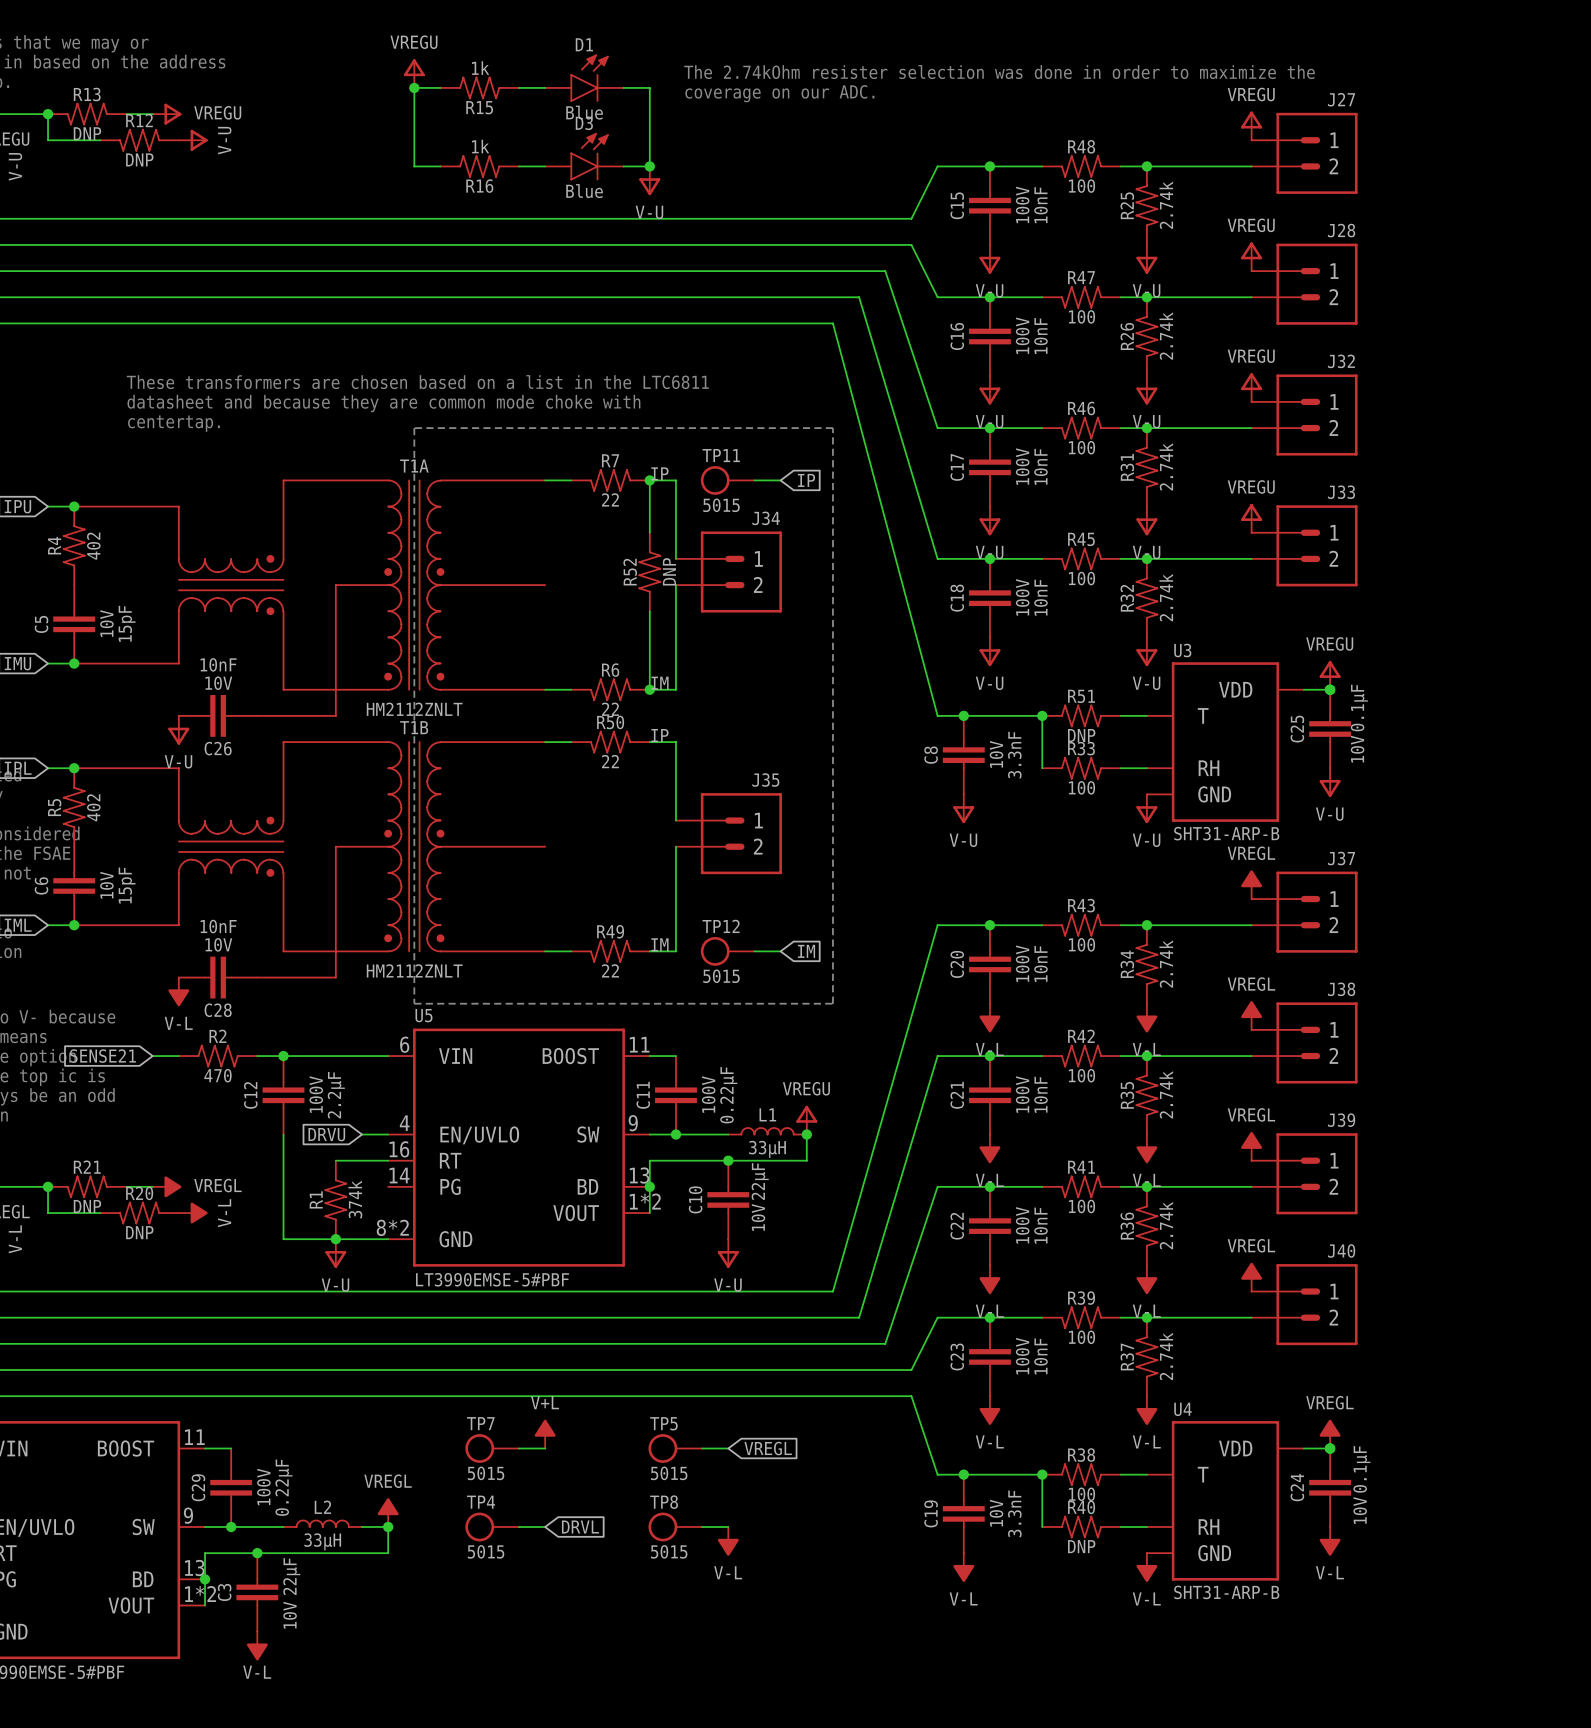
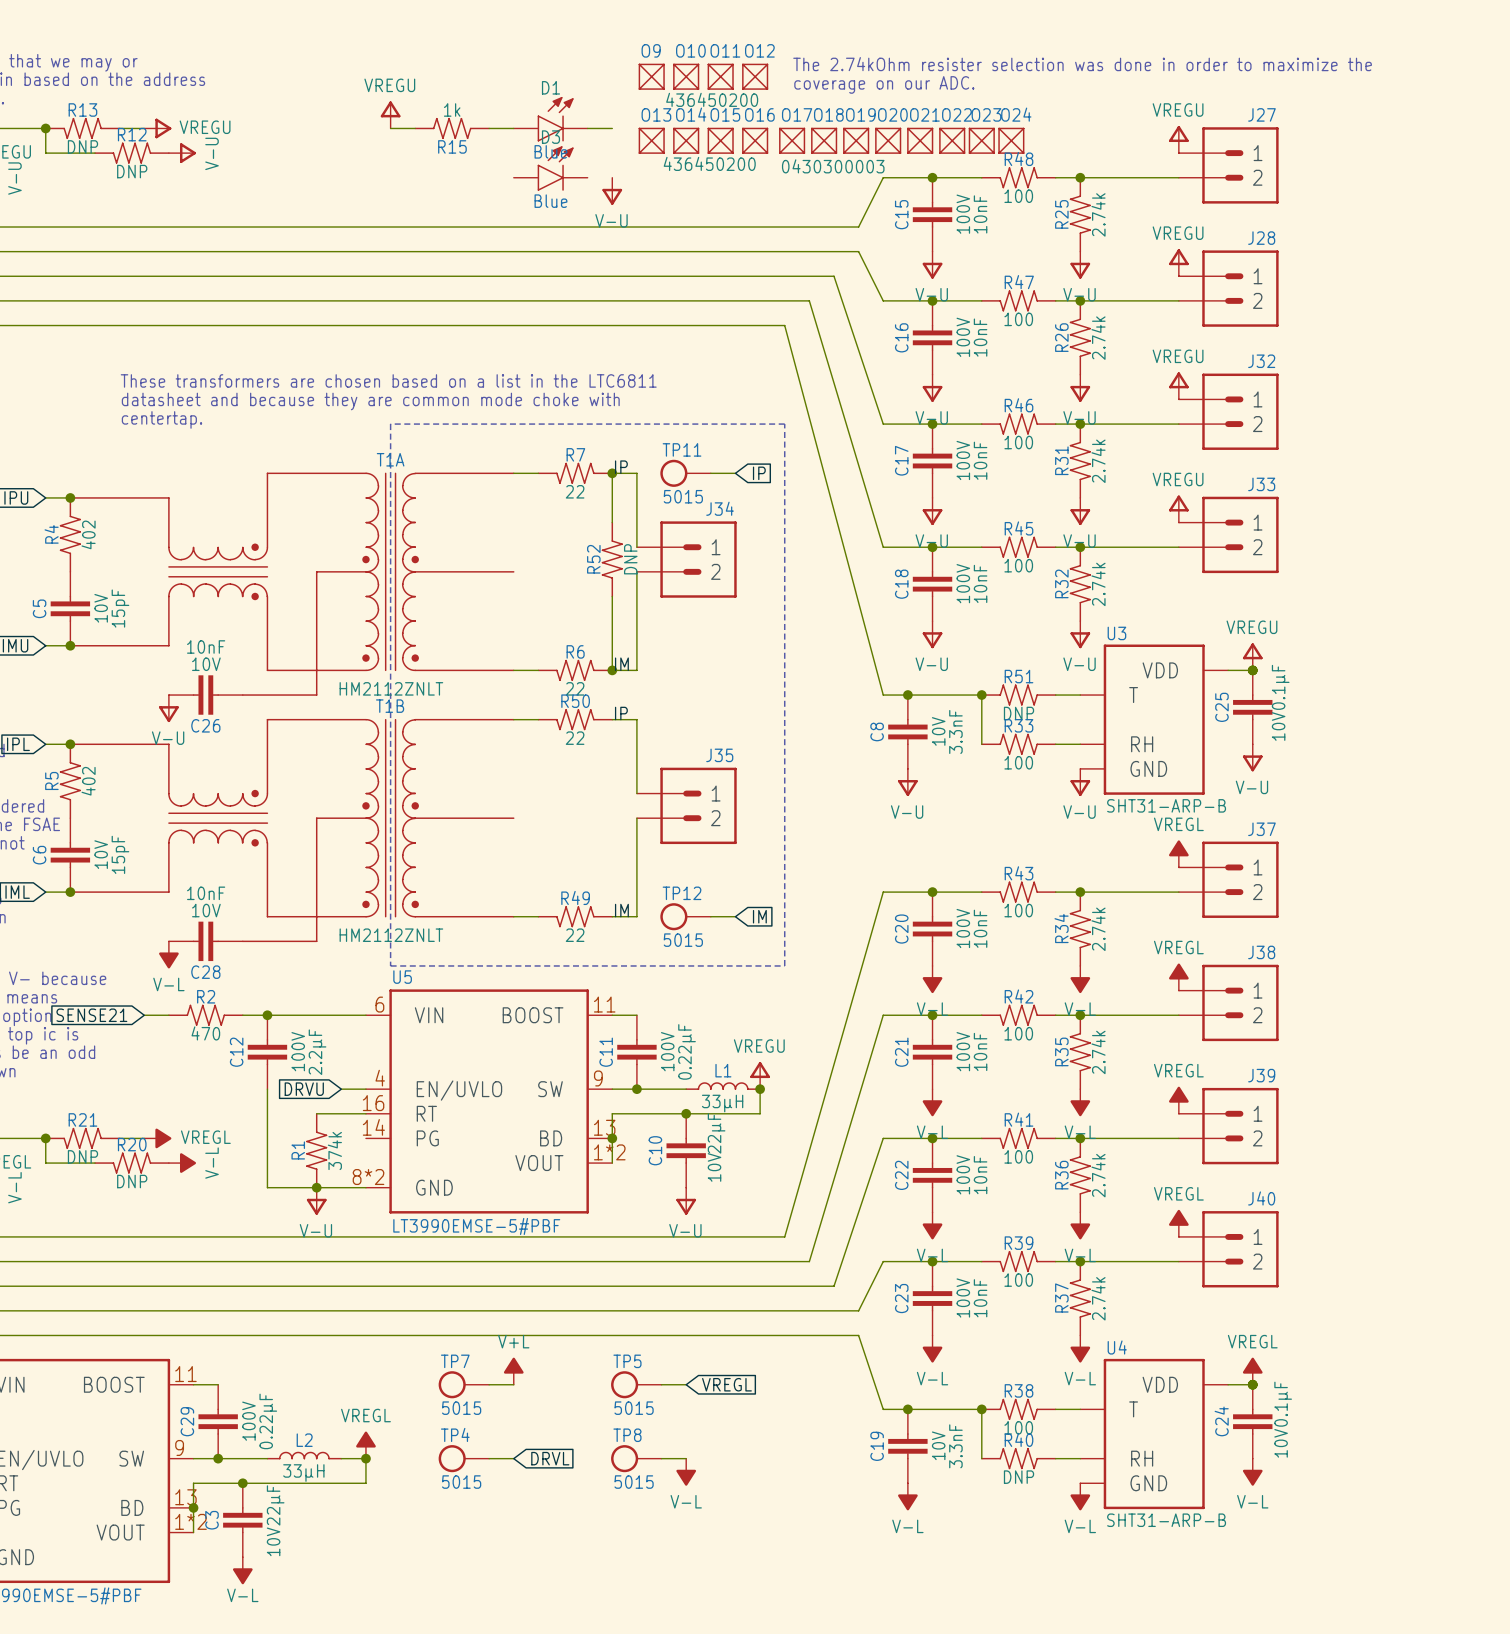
O9: none -> (651, 76)
O10: none -> (686, 76)
O11: none -> (720, 76)
O12: none -> (755, 76)
text position: The 2.74kOhm resister selection was done in order to maximize the (999, 72) -> The 2.74kOhm resister selection was done in order to maximize the (1082, 64)
power symbol position: VREGU (414, 73) -> VREGU (390, 114)
D1 position: (584, 78) -> (550, 119)
junction: (414, 87) -> none
wire: (440, 87) (414, 87) (414, 166) (440, 166) -> none
R15 position: (479, 87) -> (452, 128)
wire: (518, 87) (545, 87) -> (489, 128) (513, 128)
wire: (623, 87) (649, 87) (649, 166) (623, 166) -> none
text position: coverage on our ADC. (779, 93) -> coverage on our ADC. (884, 84)
wire: none -> (390, 128) (415, 128)
O13: none -> (651, 140)
O14: none -> (686, 140)
O15: none -> (720, 140)
O16: none -> (755, 140)
O17: none -> (792, 140)
O18: none -> (824, 140)
O19: none -> (856, 140)
O20: none -> (888, 140)
O21: none -> (920, 140)
O22: none -> (952, 140)
O23: none -> (981, 140)
O24: none -> (1011, 140)
R16: (479, 166) -> none
wire: (518, 166) (545, 166) -> (587, 128) (612, 128)
junction: (649, 166) -> none

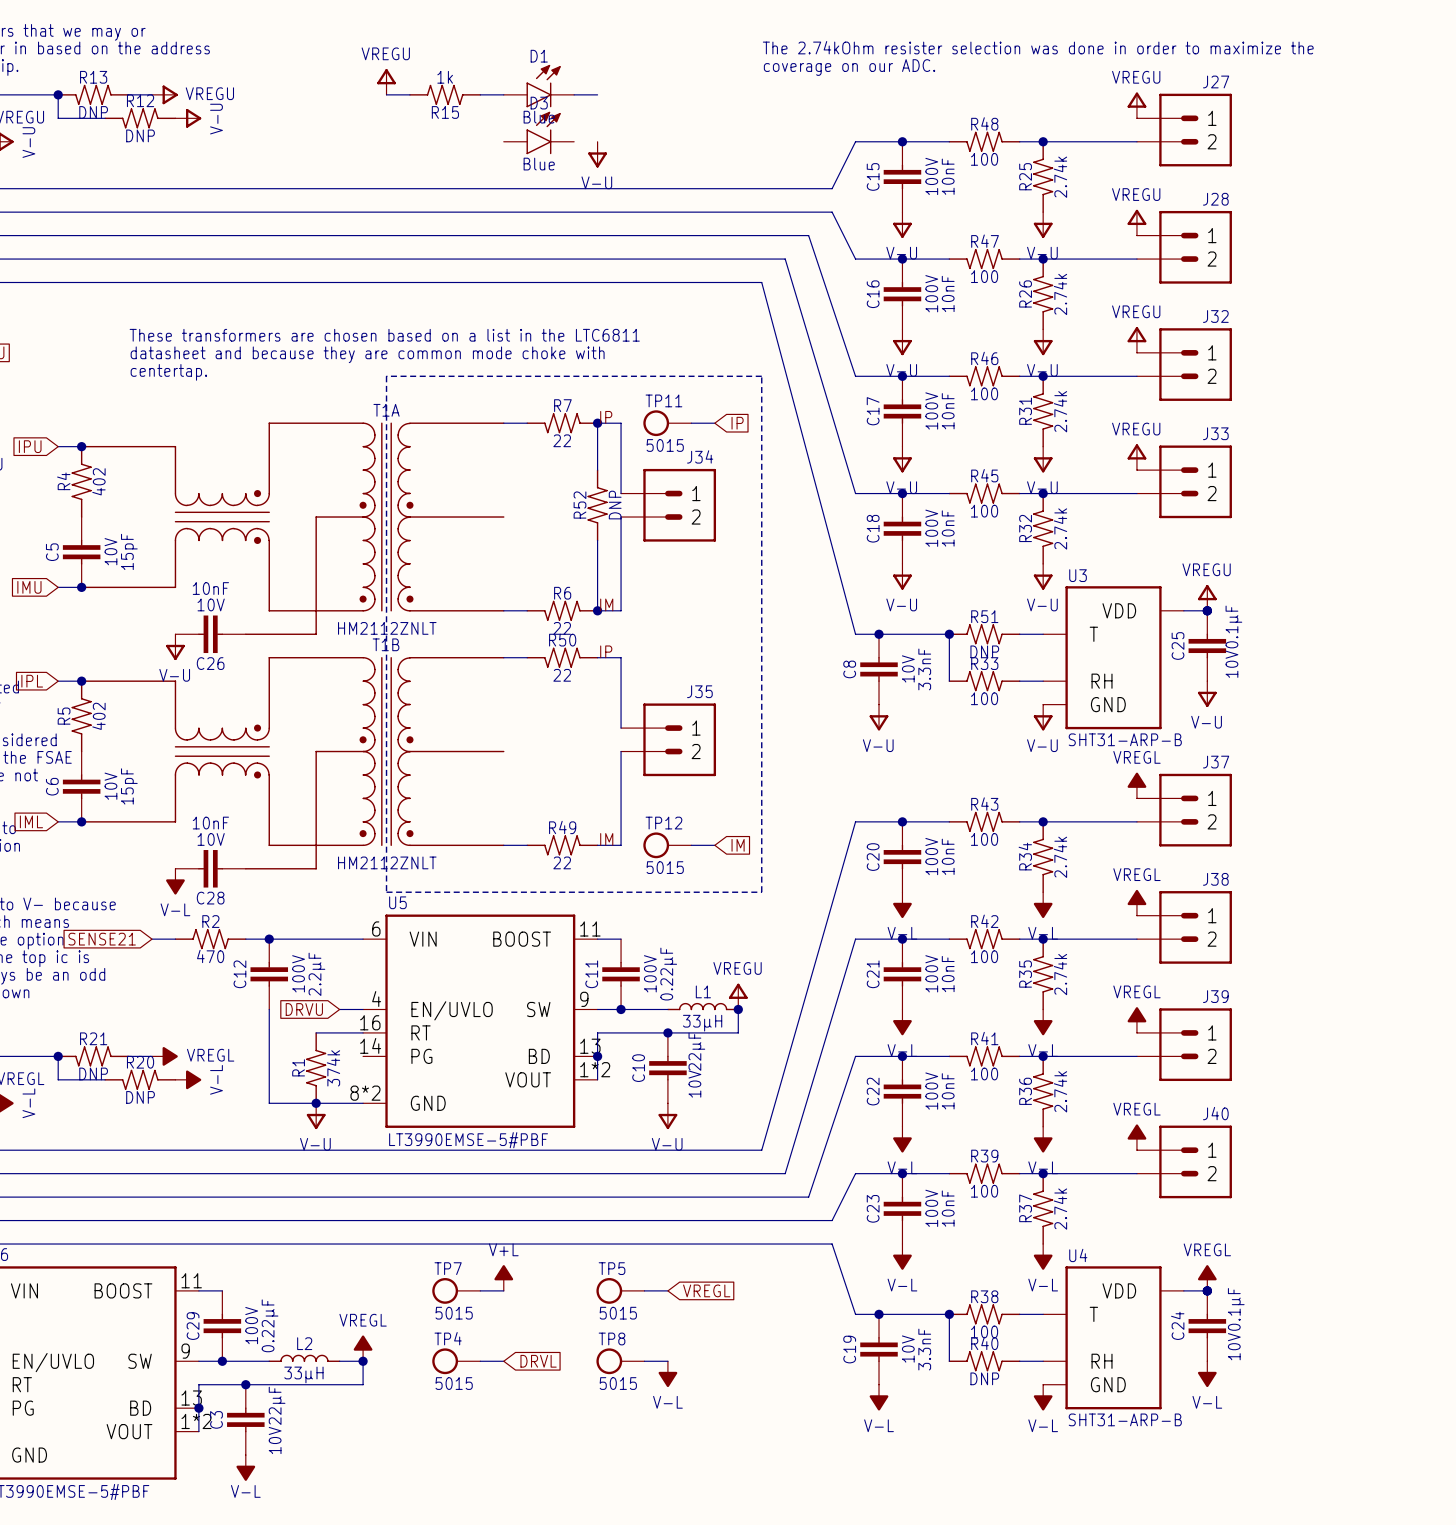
text position: The 2.74kOhm resister selection was done in order to maximize the (1082, 64) -> The 2.74kOhm resister selection was done in order to maximize the (1038, 47)
O9: (651, 76) -> none
O10: (686, 76) -> none
O11: (720, 76) -> none
O12: (755, 76) -> none
text position: coverage on our ADC. (884, 84) -> coverage on our ADC. (849, 67)
O13: (651, 140) -> none
O14: (686, 140) -> none
O15: (720, 140) -> none
O16: (755, 140) -> none
O17: (792, 140) -> none
O18: (824, 140) -> none
O19: (856, 140) -> none
O20: (888, 140) -> none
O21: (920, 140) -> none
O22: (952, 140) -> none
O23: (981, 140) -> none
O24: (1011, 140) -> none

